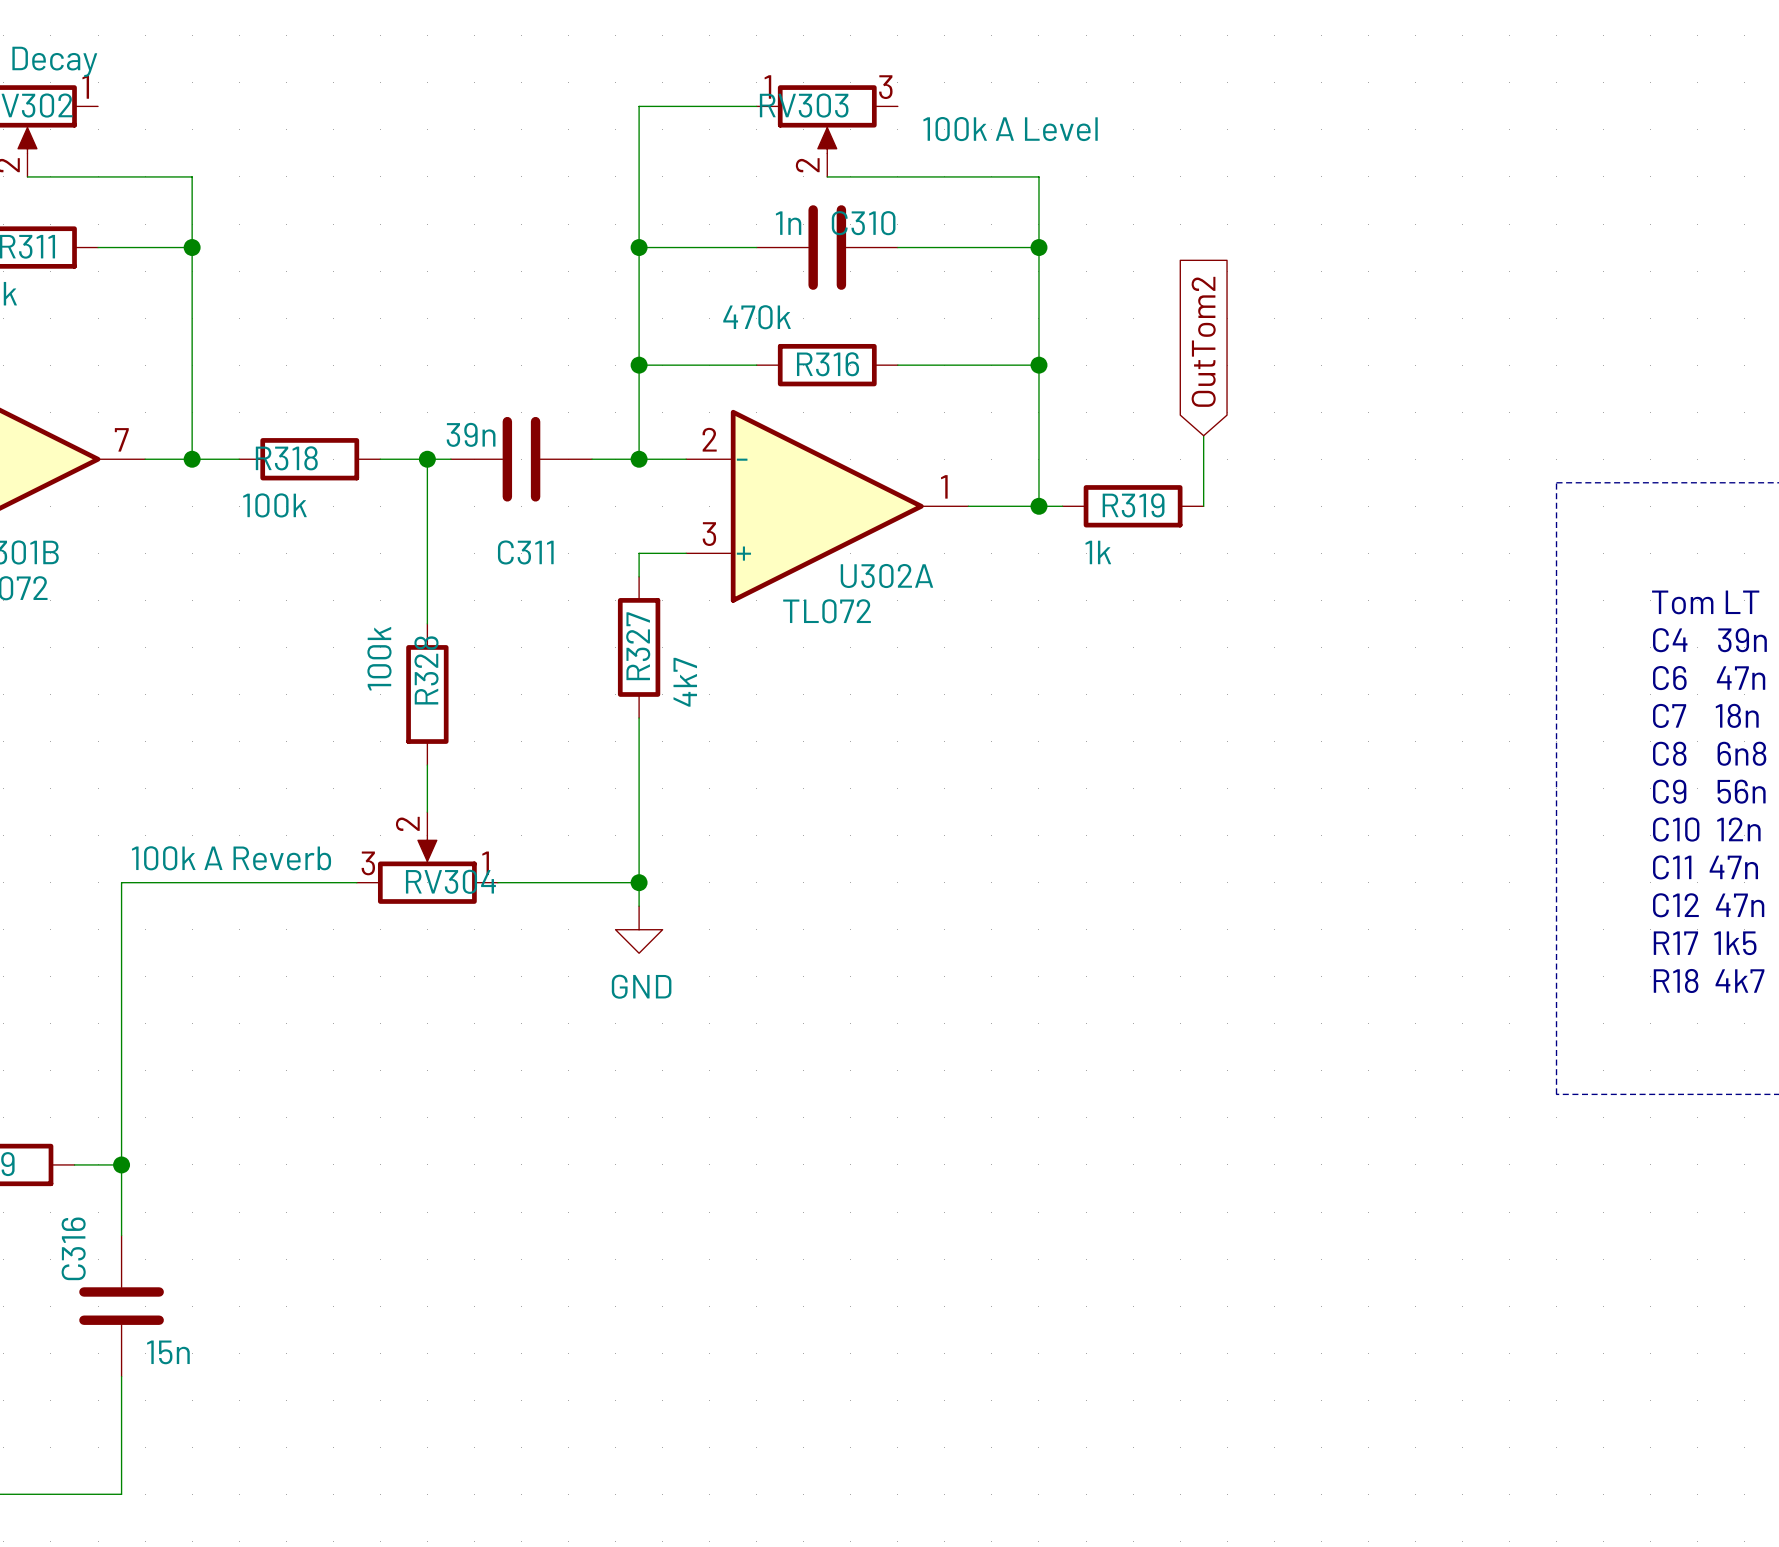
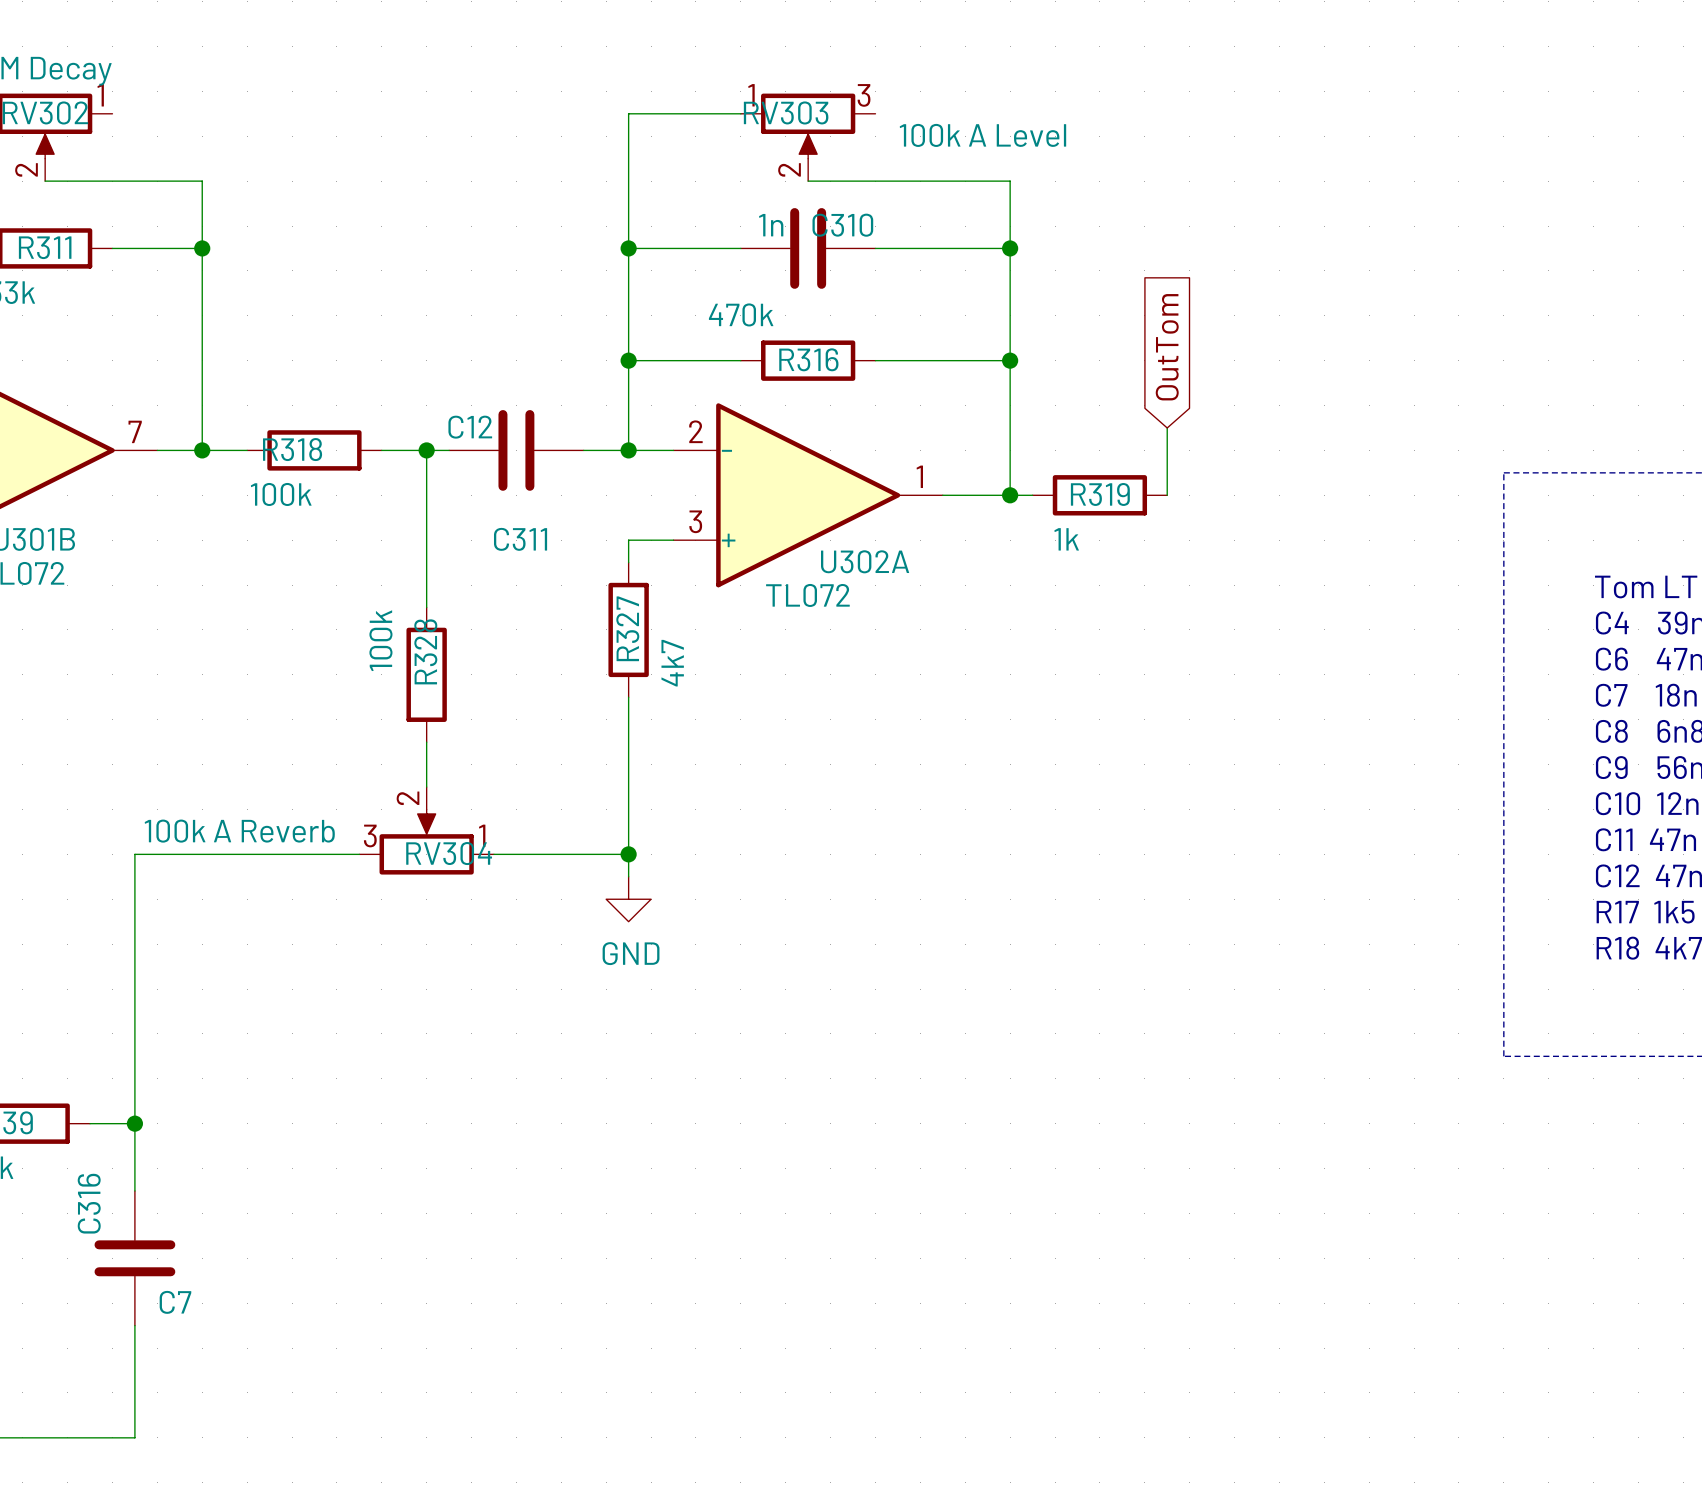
global label: OutTom2 (1203, 341) -> OutTom (1167, 347)
C311 value: 39n (471, 434) -> C12 (470, 427)
C316 value: 15n (168, 1352) -> C7 (175, 1302)

